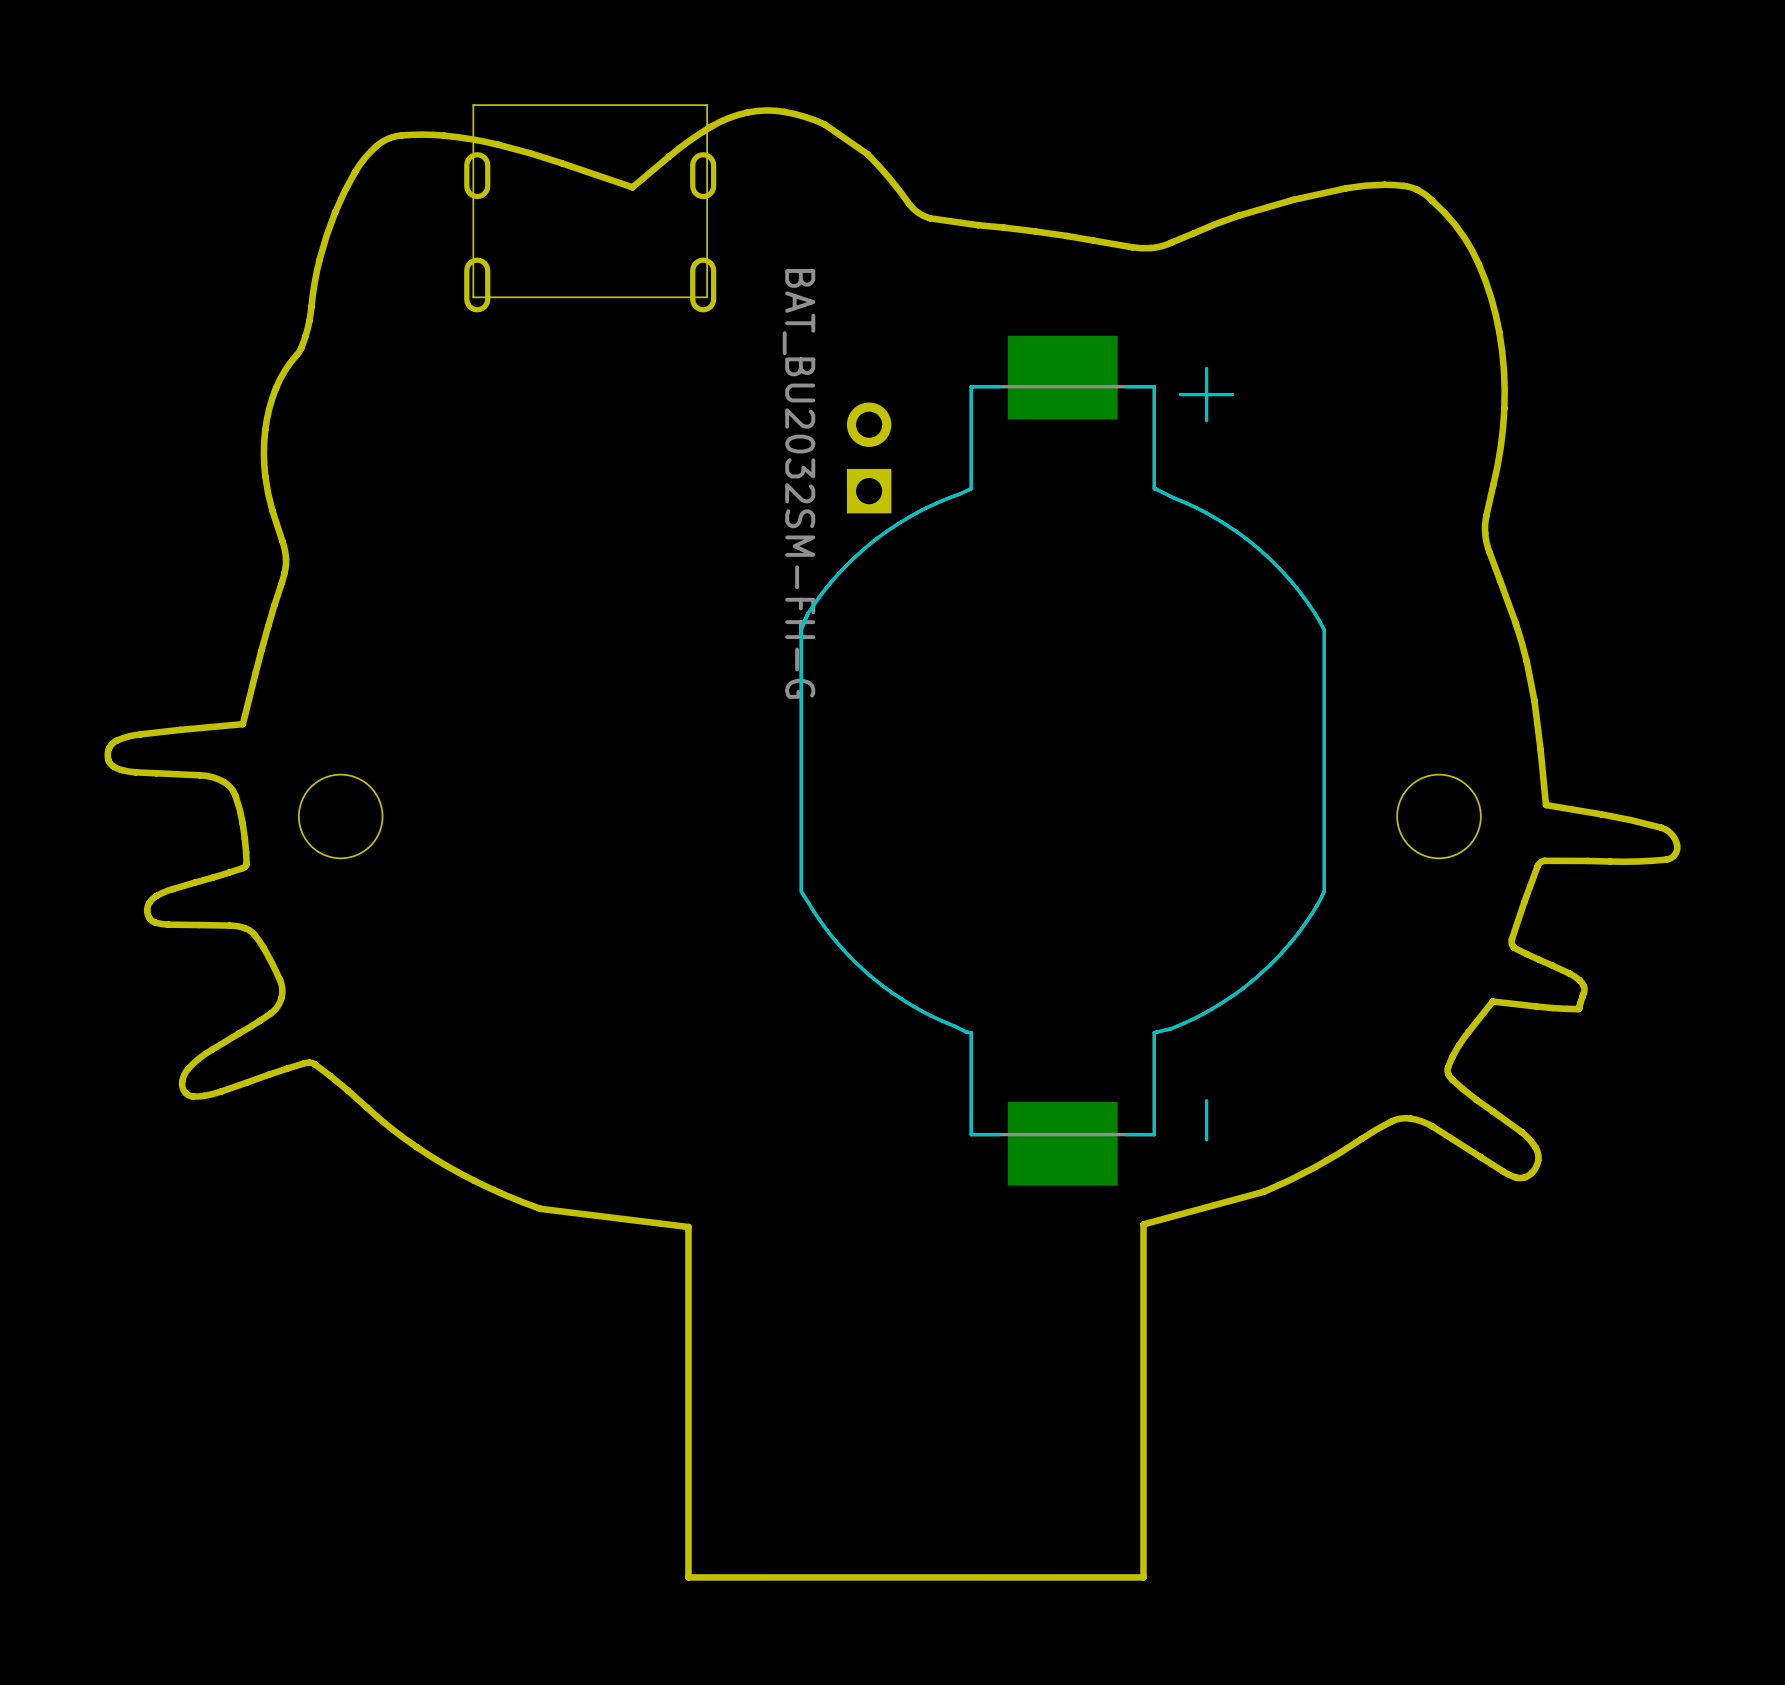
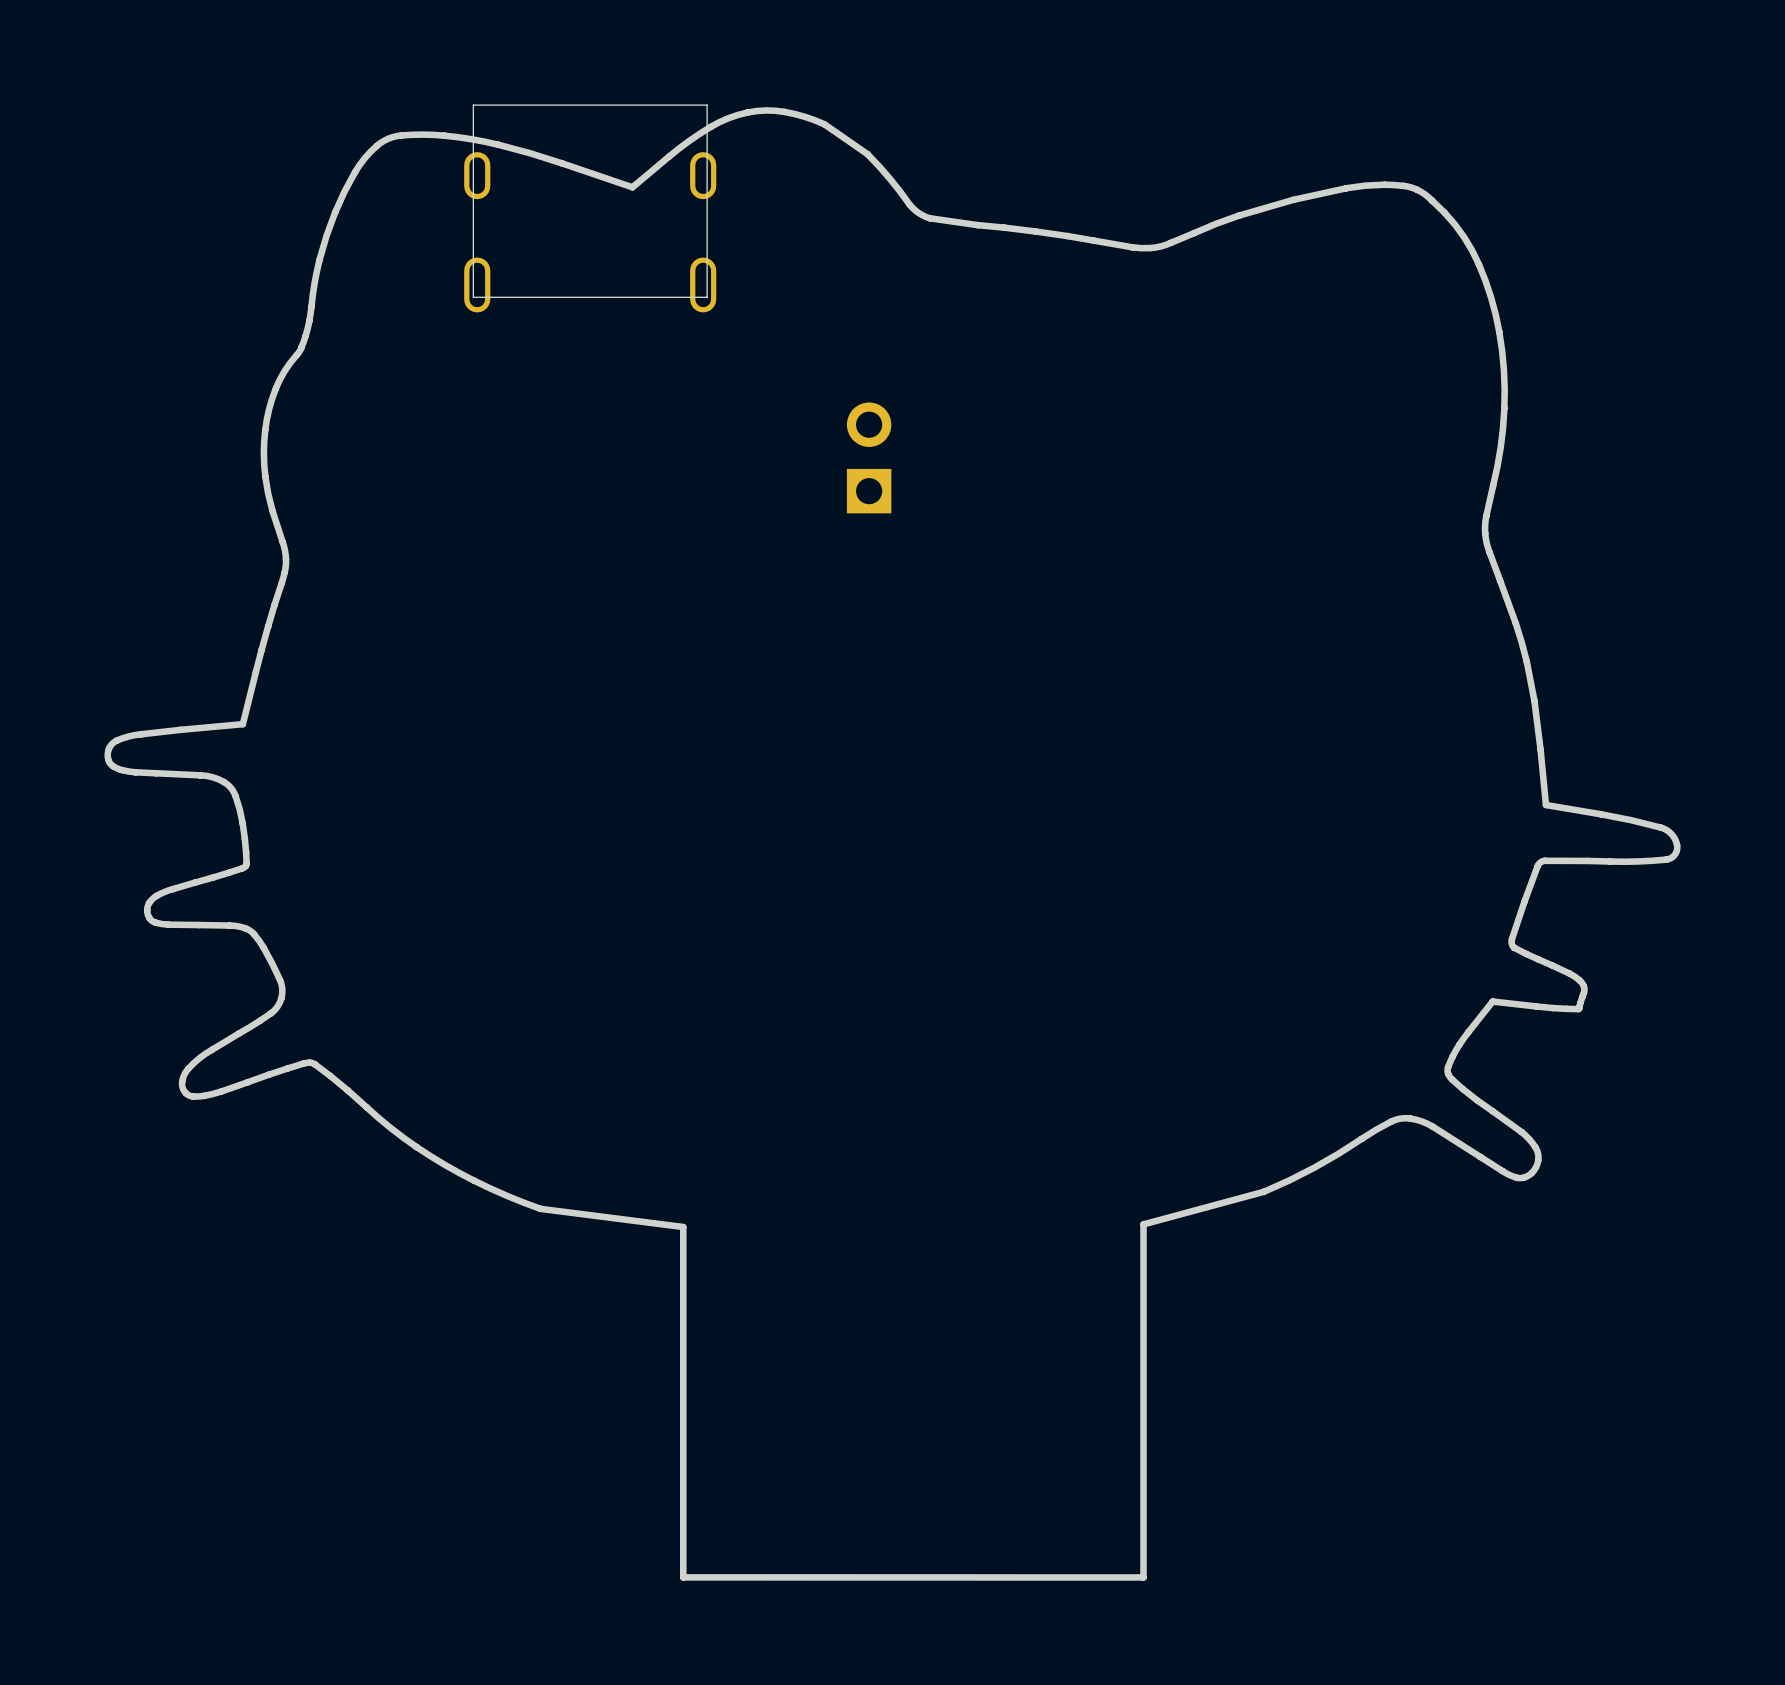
part footprint: [104, 107, 1681, 1581] -> [104, 107, 1681, 1581]
part: BAT_BU2032SM-FH-G (1062, 760) -> none

